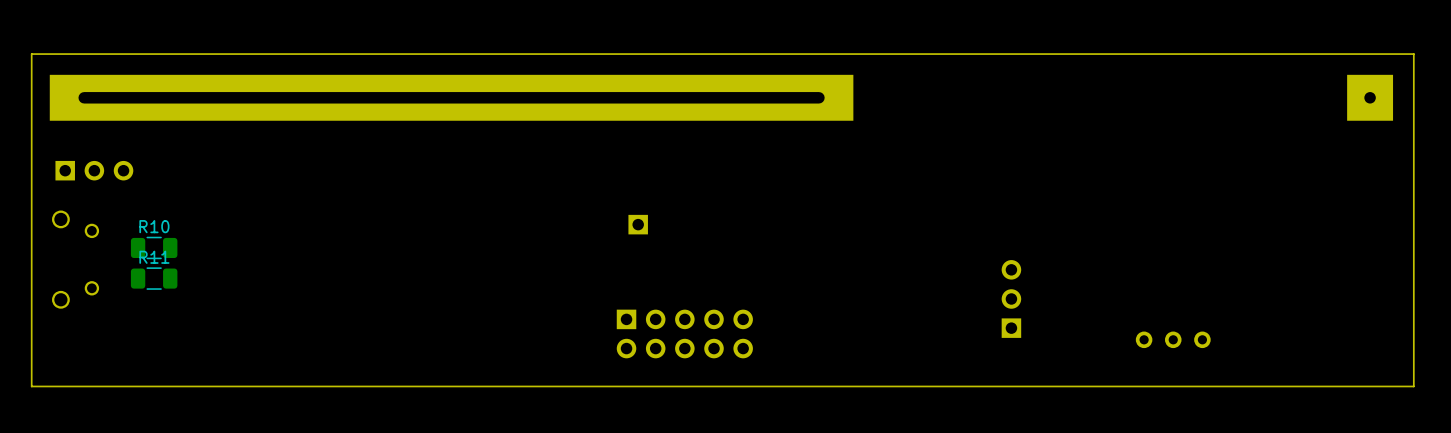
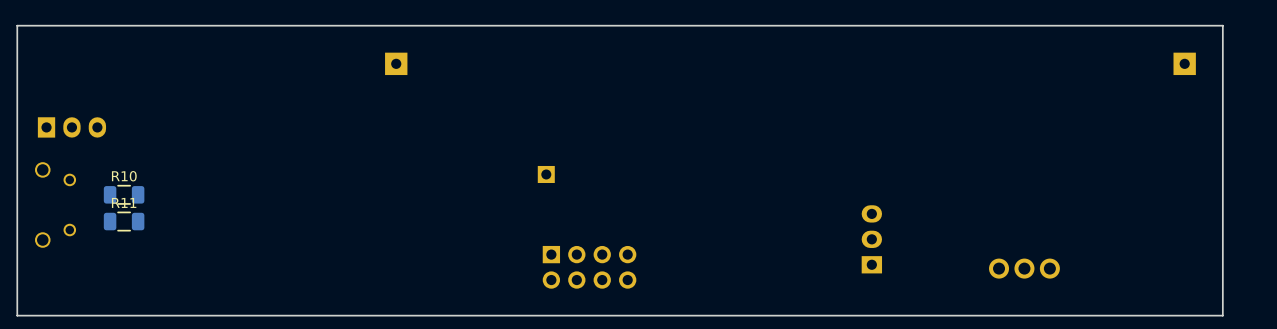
part footprint: [1347, 74, 1394, 121] -> [1173, 52, 1196, 76]
part: (451, 97) -> none
part: none -> (396, 63)
part footprint: [55, 160, 134, 181] -> [37, 117, 107, 138]
part footprint: [1001, 260, 1022, 338] -> [861, 205, 883, 274]
part footprint: [616, 309, 753, 359] -> [542, 245, 637, 289]
part: none -> (1024, 268)
part: (1173, 339) -> none

